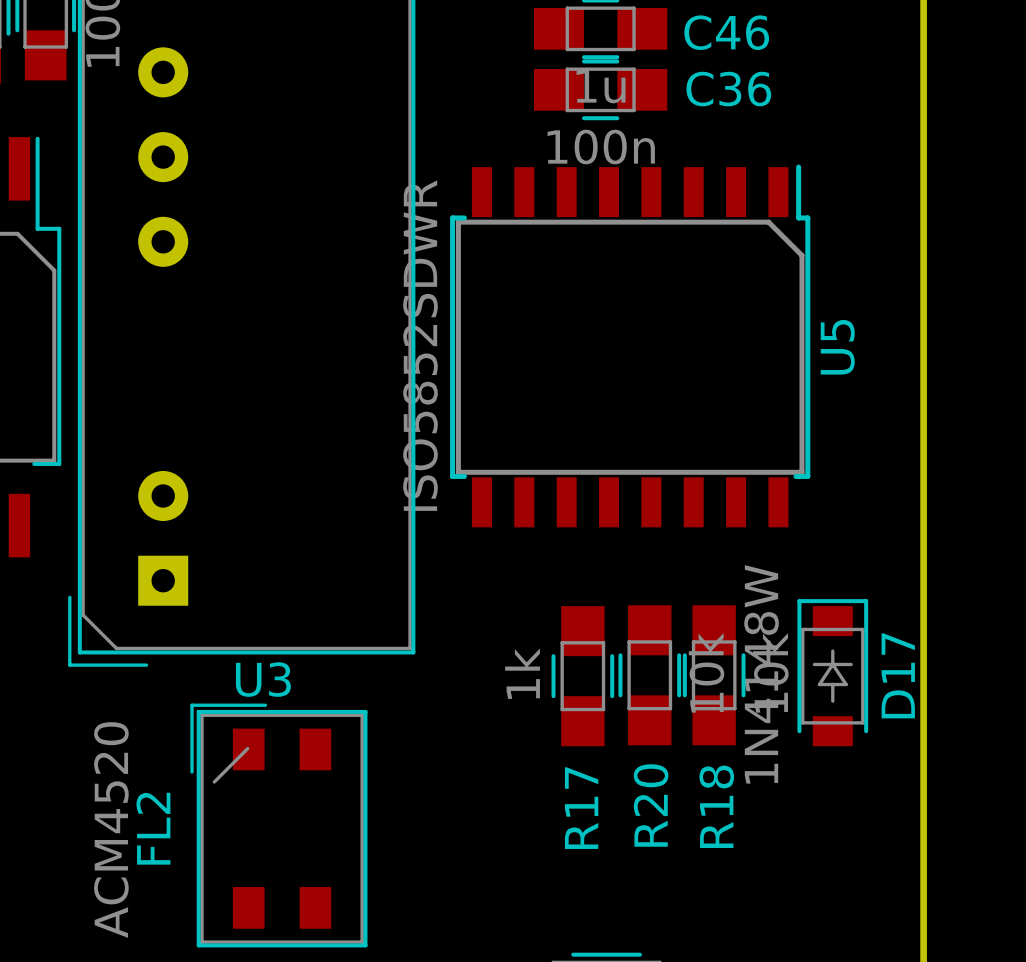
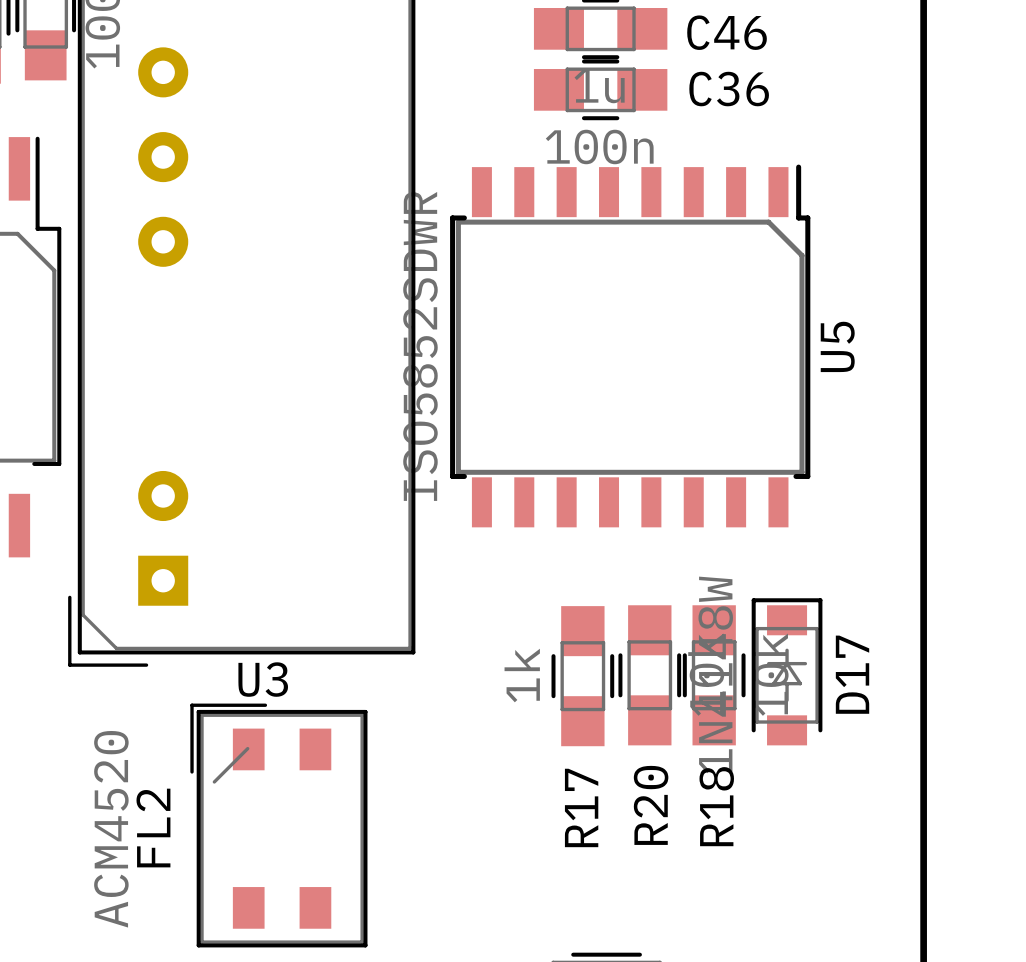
D17 position: (832, 672) -> (787, 671)

